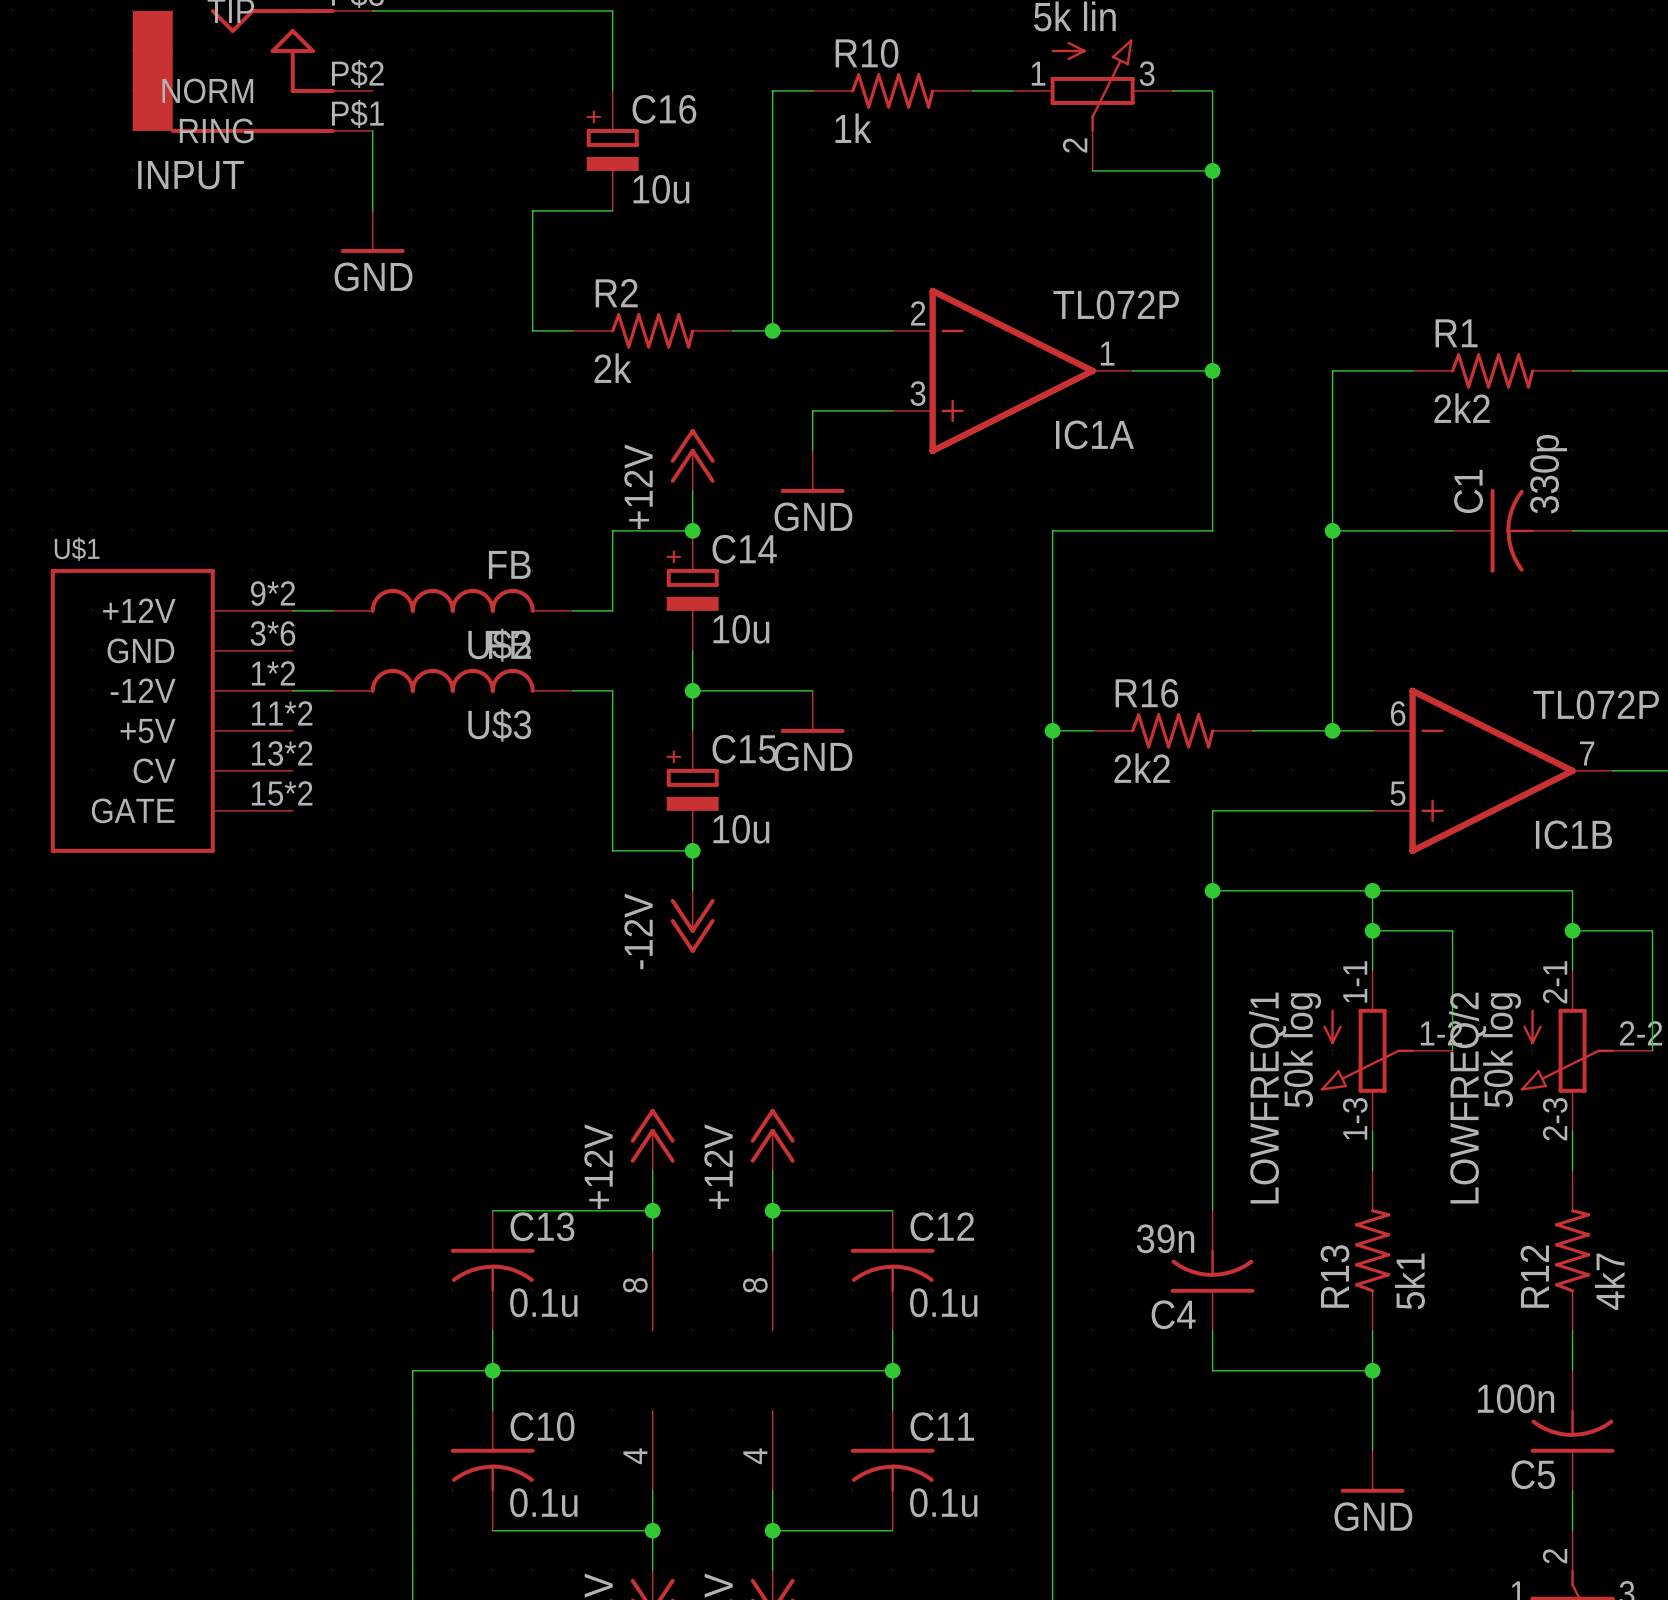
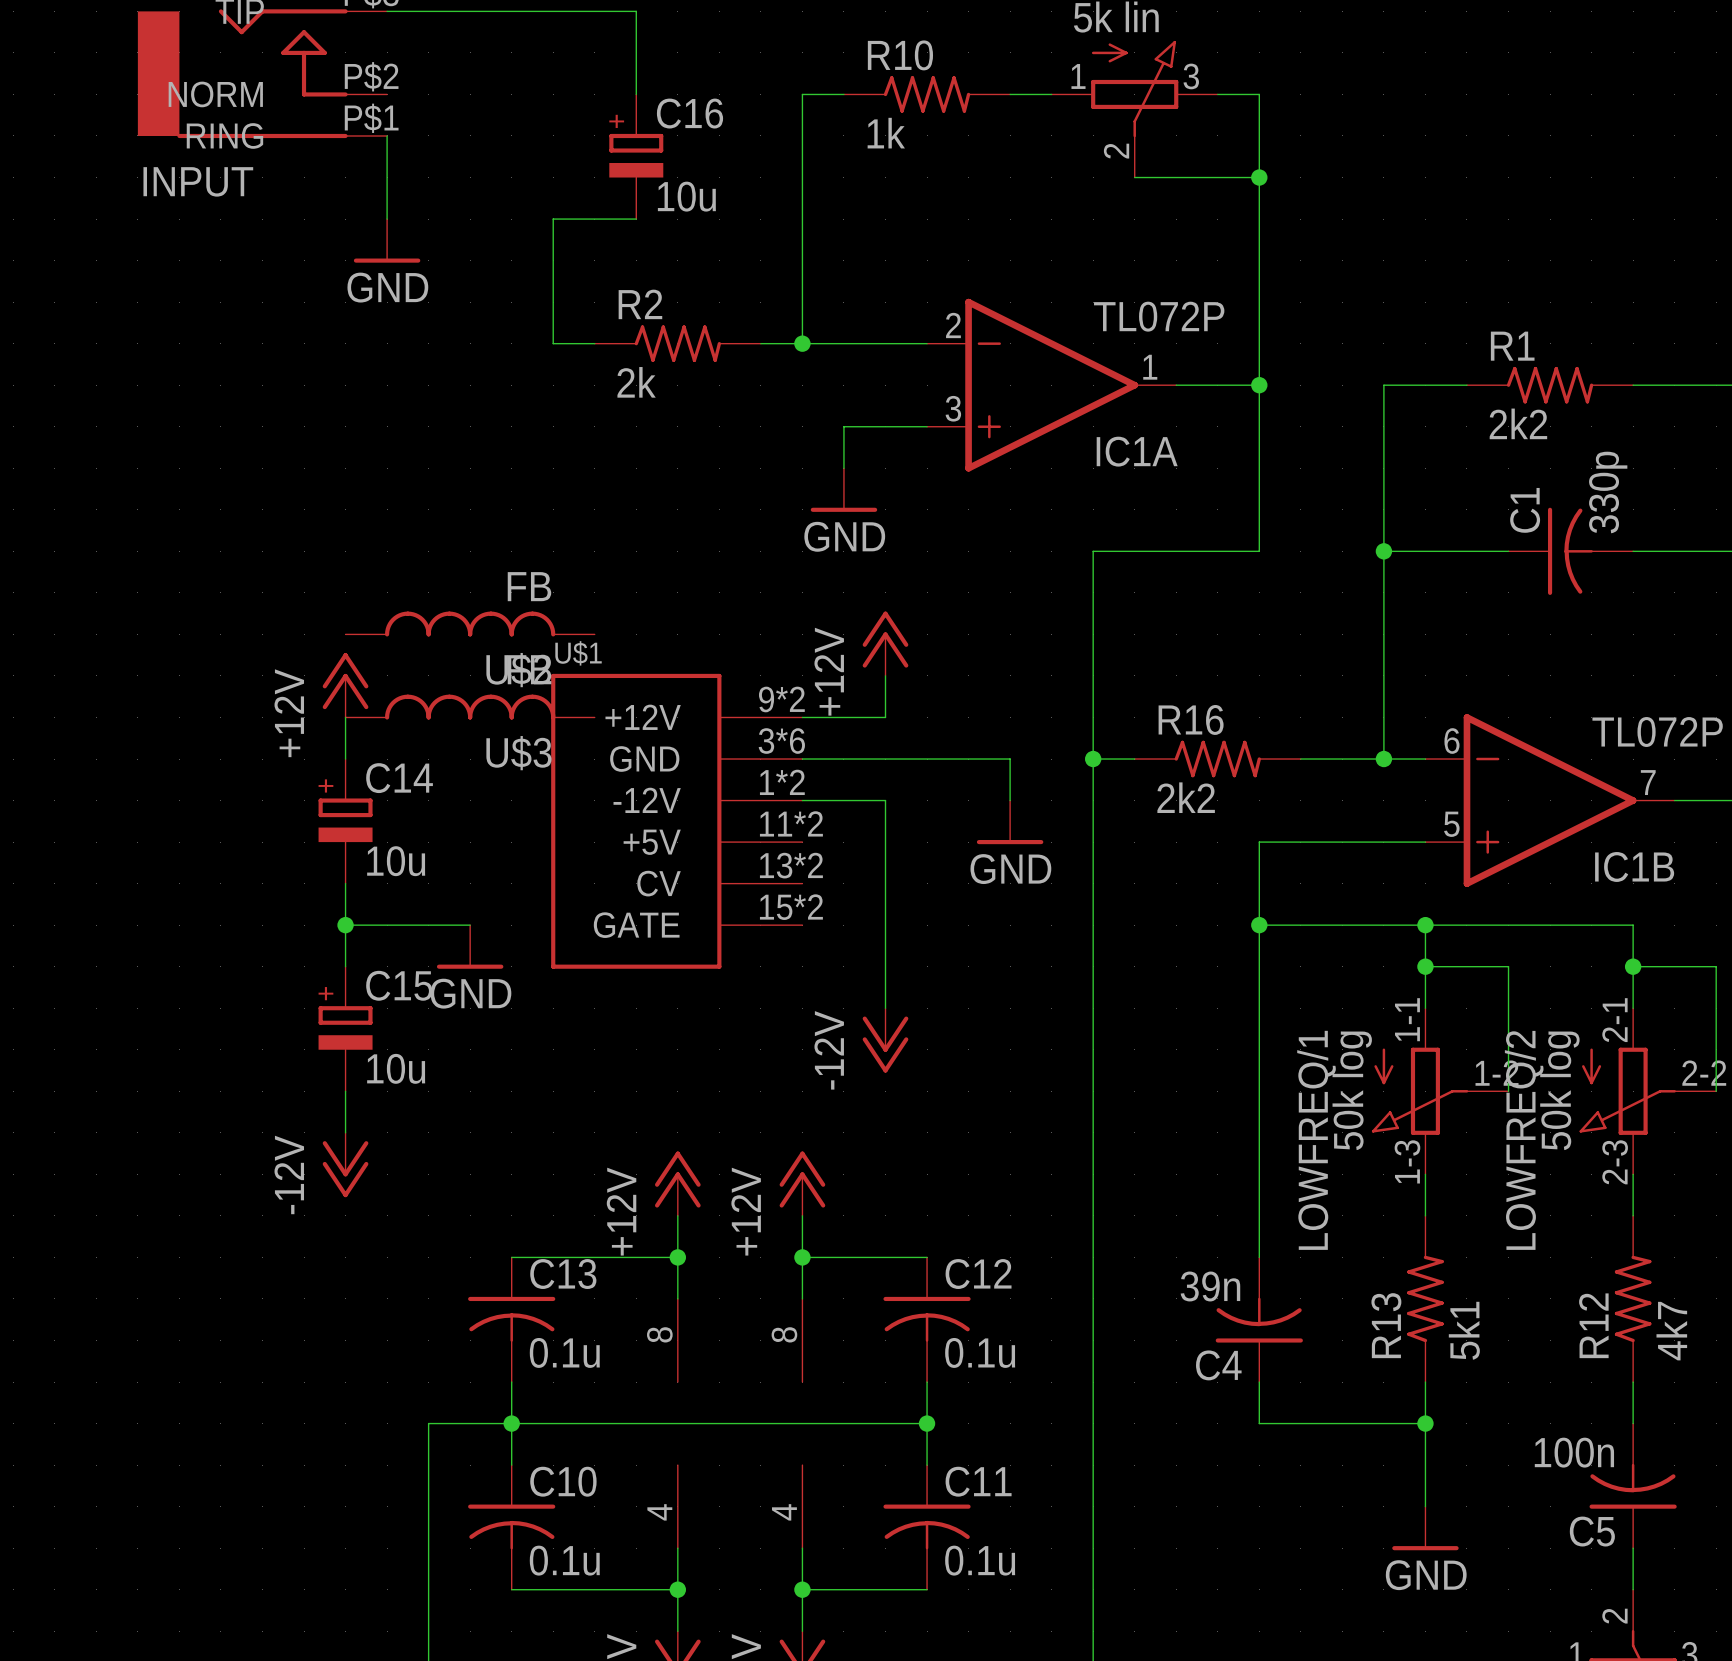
power symbol: +12V (692, 459) -> none
wire: (692, 490) (692, 530) (612, 530) (612, 610) (572, 610) -> none
junction: (692, 530) -> none
C14 position: (692, 590) -> (345, 821)
wire: (292, 610) (332, 610) -> none
power symbol: none -> +12V (885, 643)
wire: none -> (885, 675) (885, 717) (843, 717)
power symbol: none -> +12V (345, 685)
wire: (292, 690) (332, 690) -> (345, 759) (345, 717)
wire: (572, 690) (612, 690) (612, 850) (692, 850) (692, 890) -> none
junction: (692, 690) -> none
U$1 position: (171, 710) -> (676, 821)
power symbol position: GND (812, 711) -> GND (1010, 822)
wire: none -> (802, 759) (1010, 759) (1010, 800)
wire: none -> (802, 800) (885, 800) (885, 1008)
C15 position: (692, 790) -> (345, 1028)
wire: none -> (345, 883) (345, 966)
junction: (692, 850) -> none
wire: none -> (345, 925) (470, 925)
junction: none -> (345, 925)
power symbol: none -> GND (470, 946)
power symbol position: -12V (692, 921) -> -12V (885, 1040)
wire: none -> (345, 1091) (345, 1132)
power symbol: none -> -12V (345, 1165)

